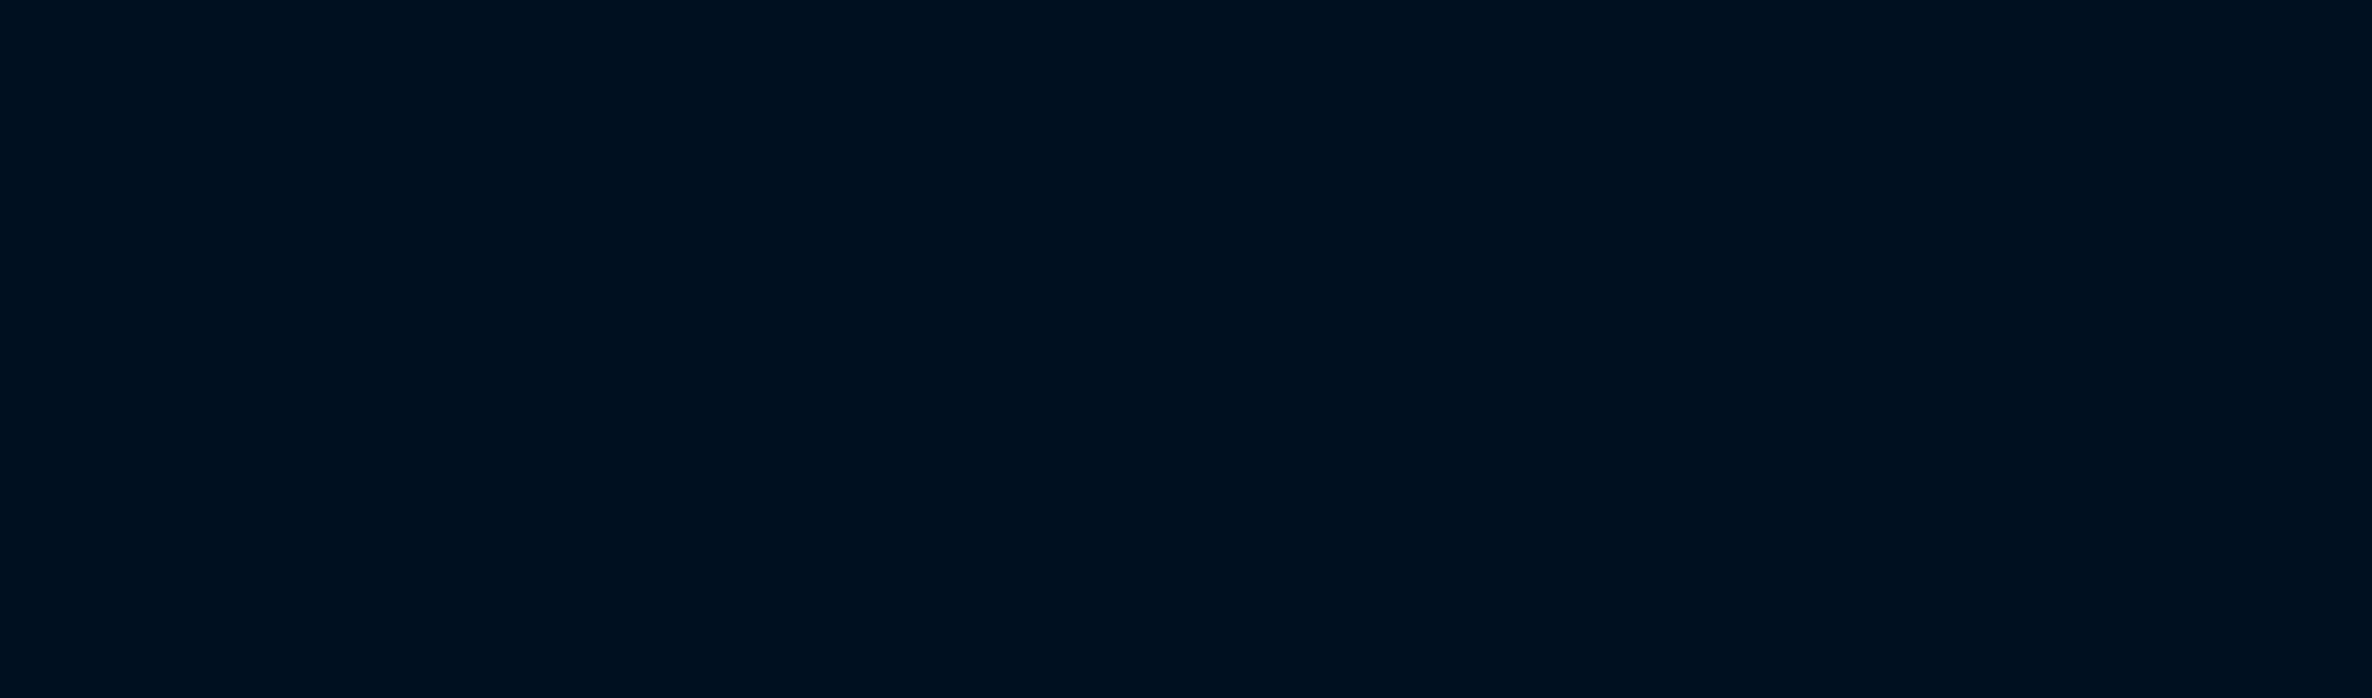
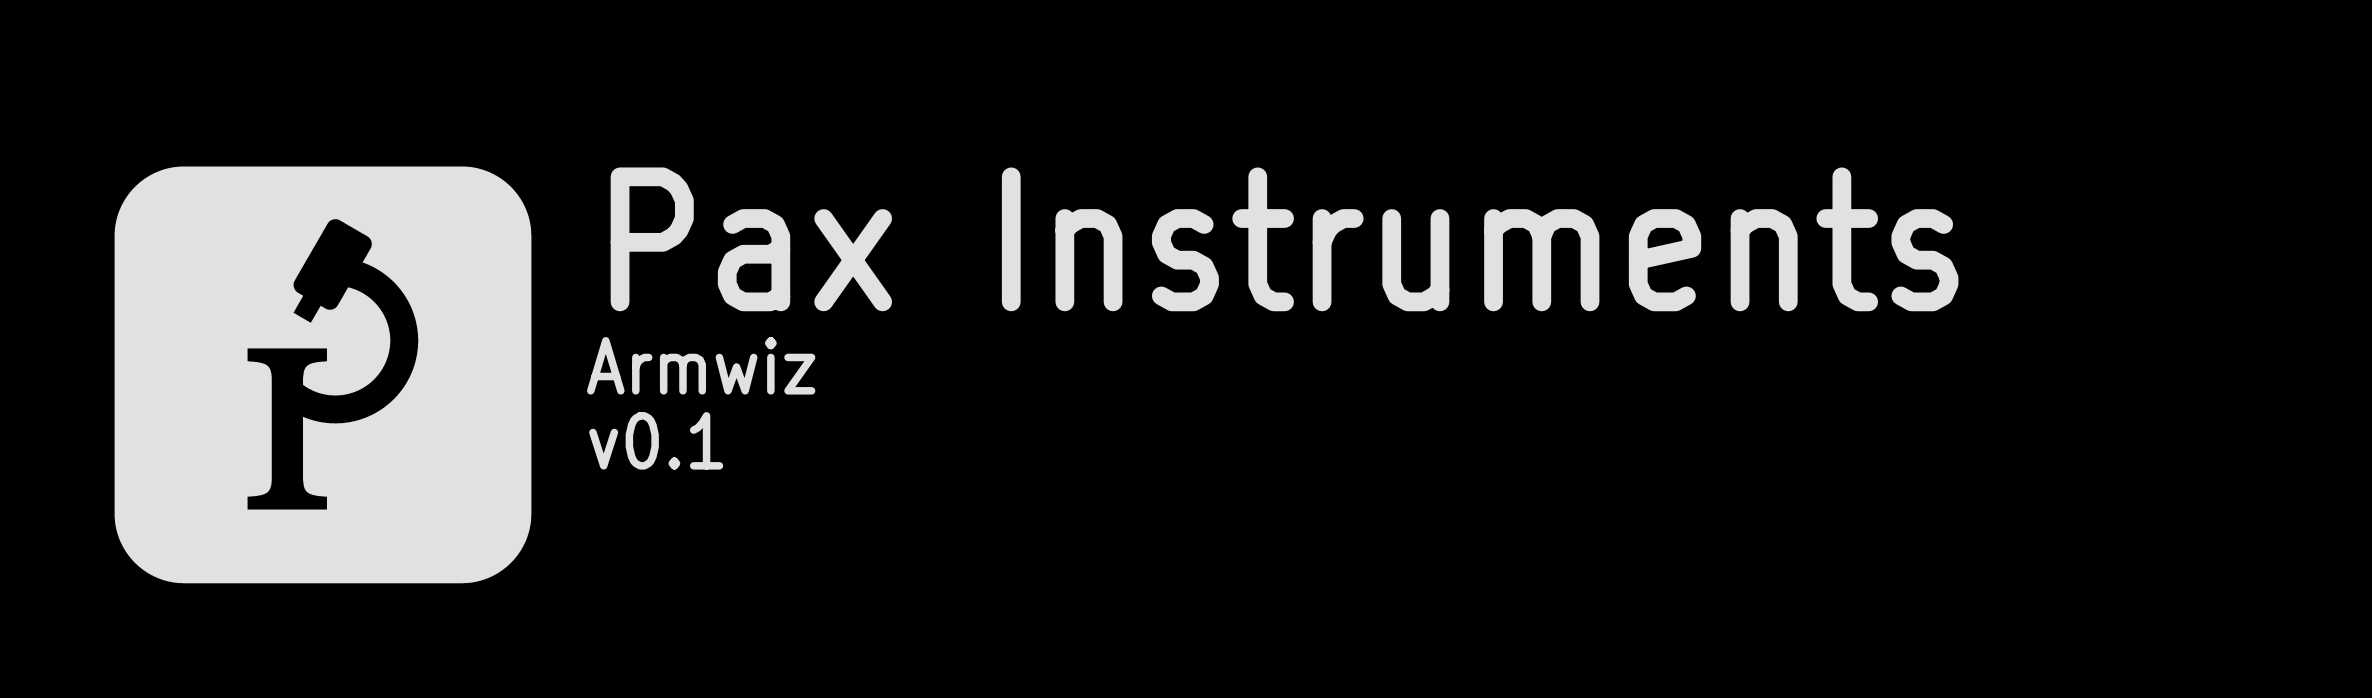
drawing: none -> [114, 166, 532, 584]
text: none -> Pax Instruments (1284, 239)
text: none -> Armwiz (701, 365)
text: none -> v0.1 (656, 440)

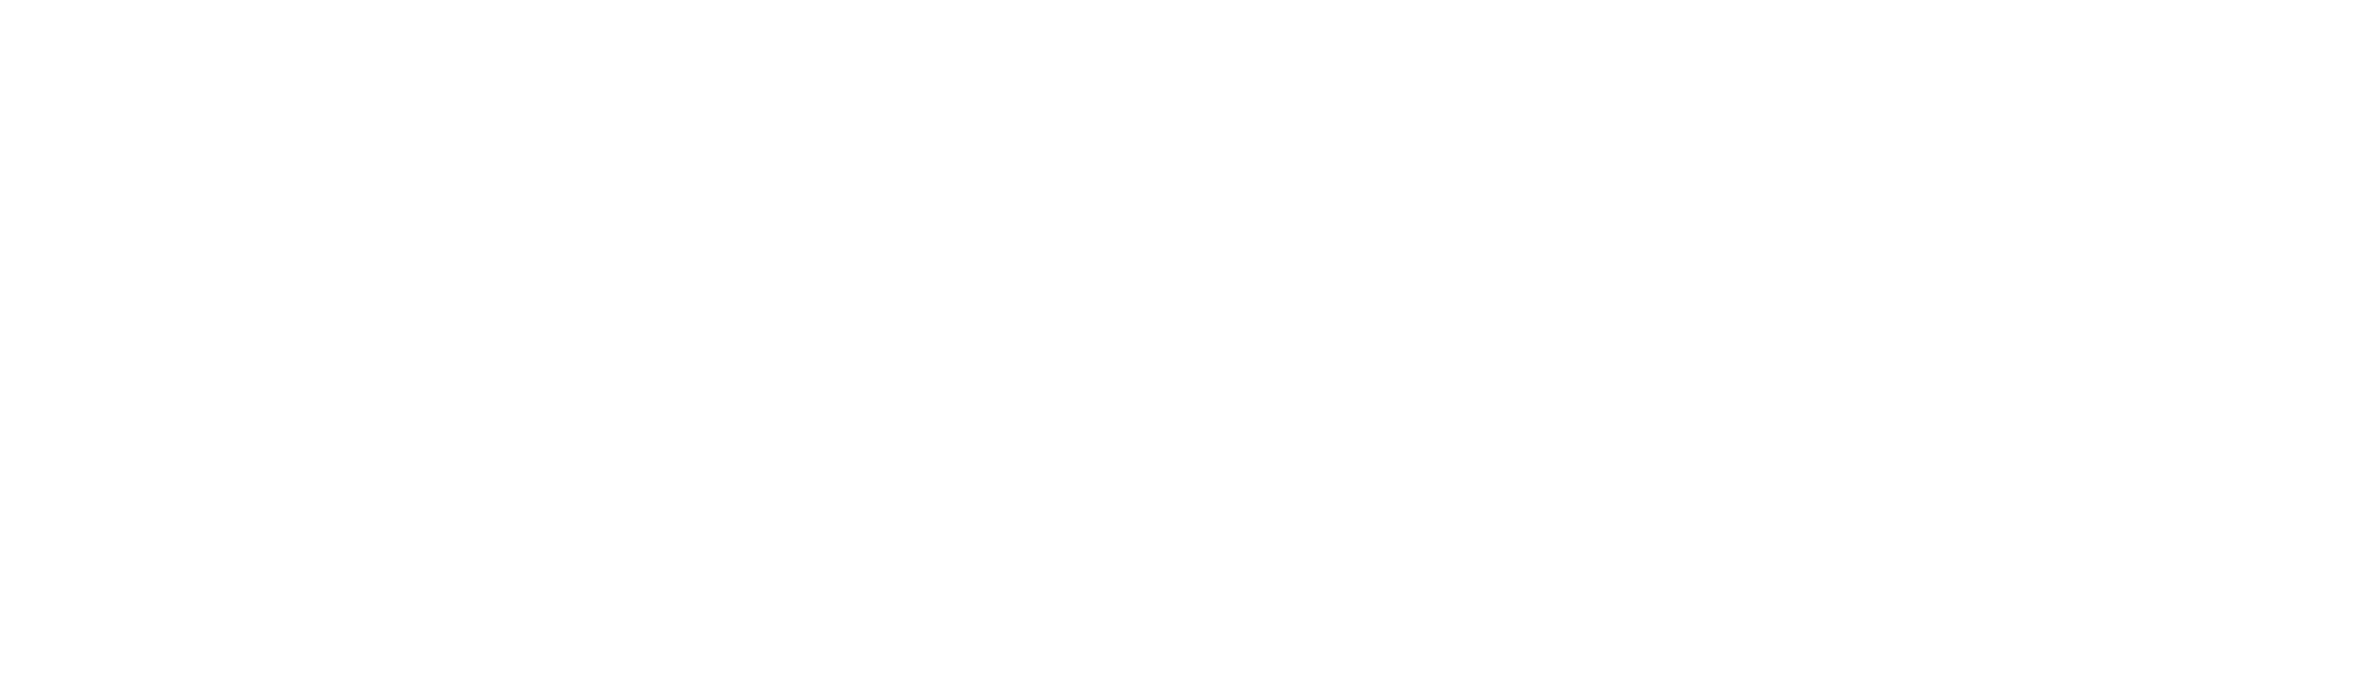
drawing: [114, 166, 532, 584] -> none
text: Pax Instruments (1284, 239) -> none
text: Armwiz (701, 365) -> none
text: v0.1 (656, 440) -> none

